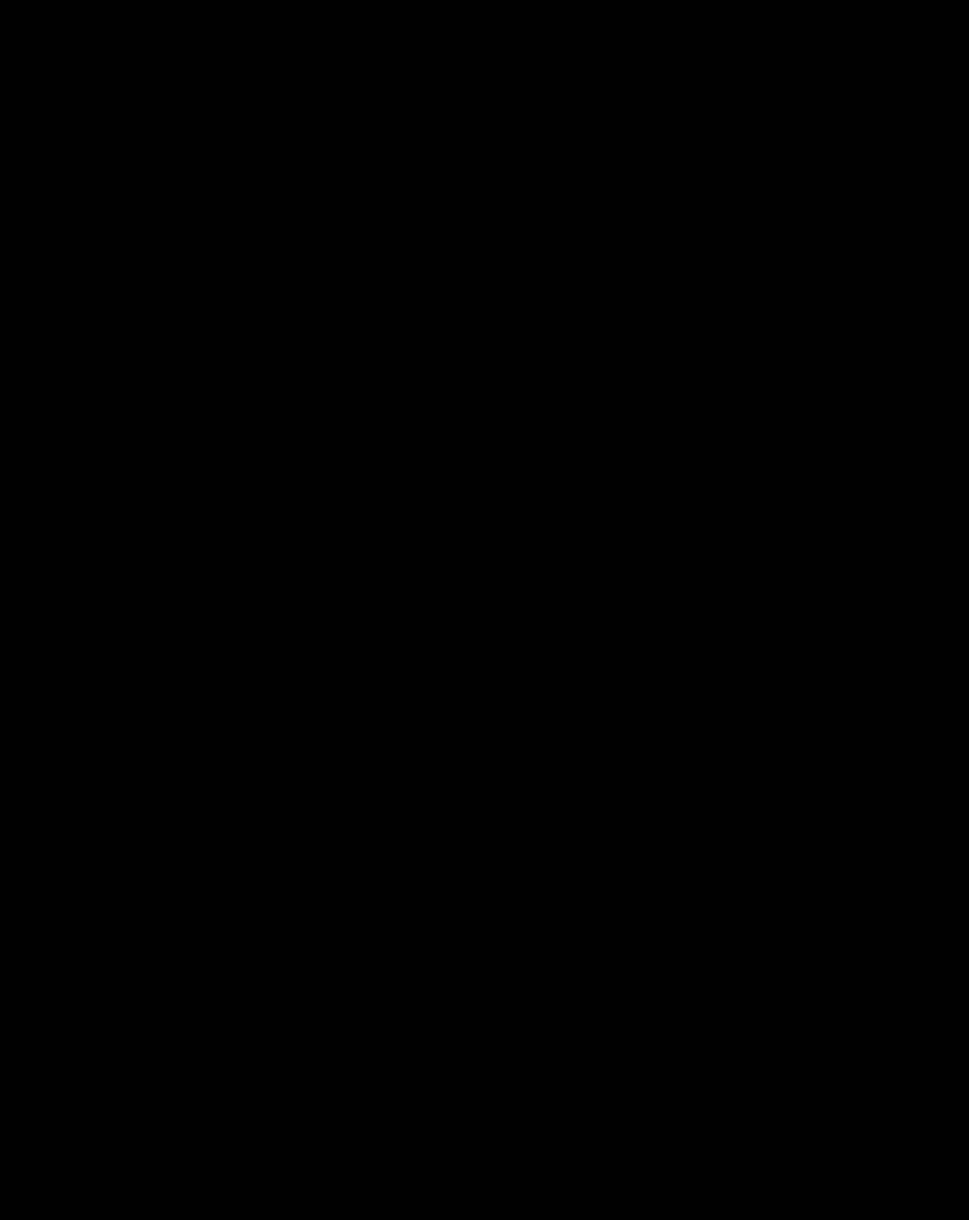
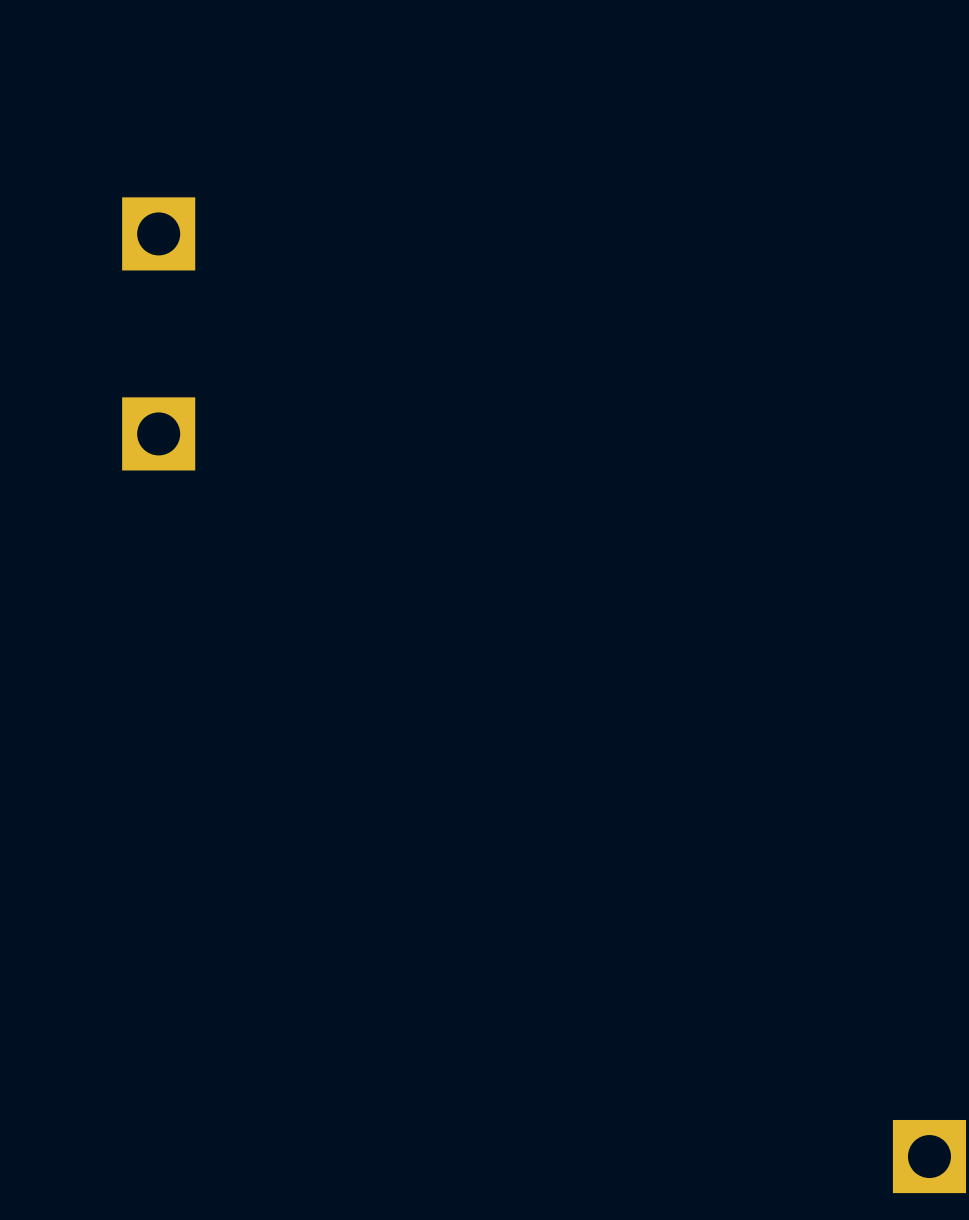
part: none -> (158, 233)
part: none -> (158, 433)
part: none -> (929, 1156)

